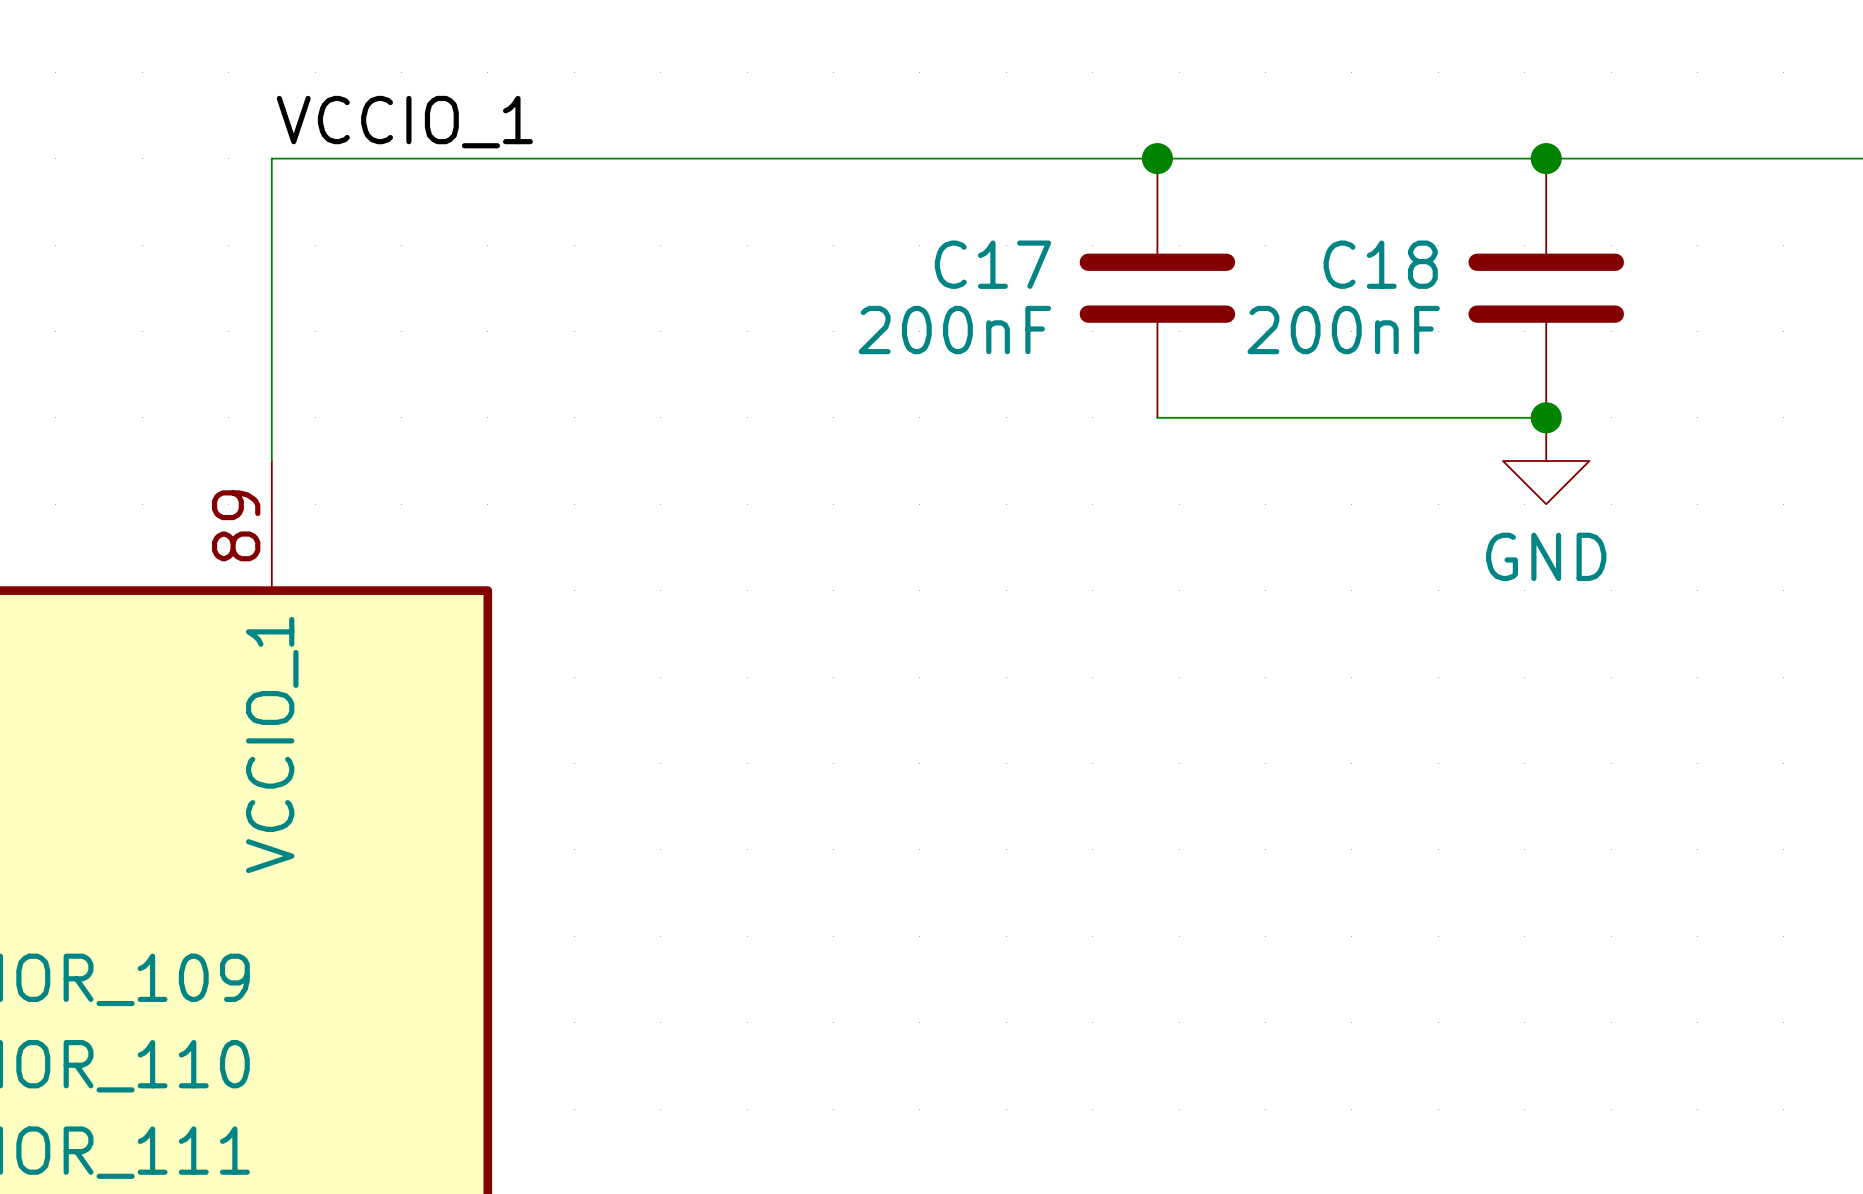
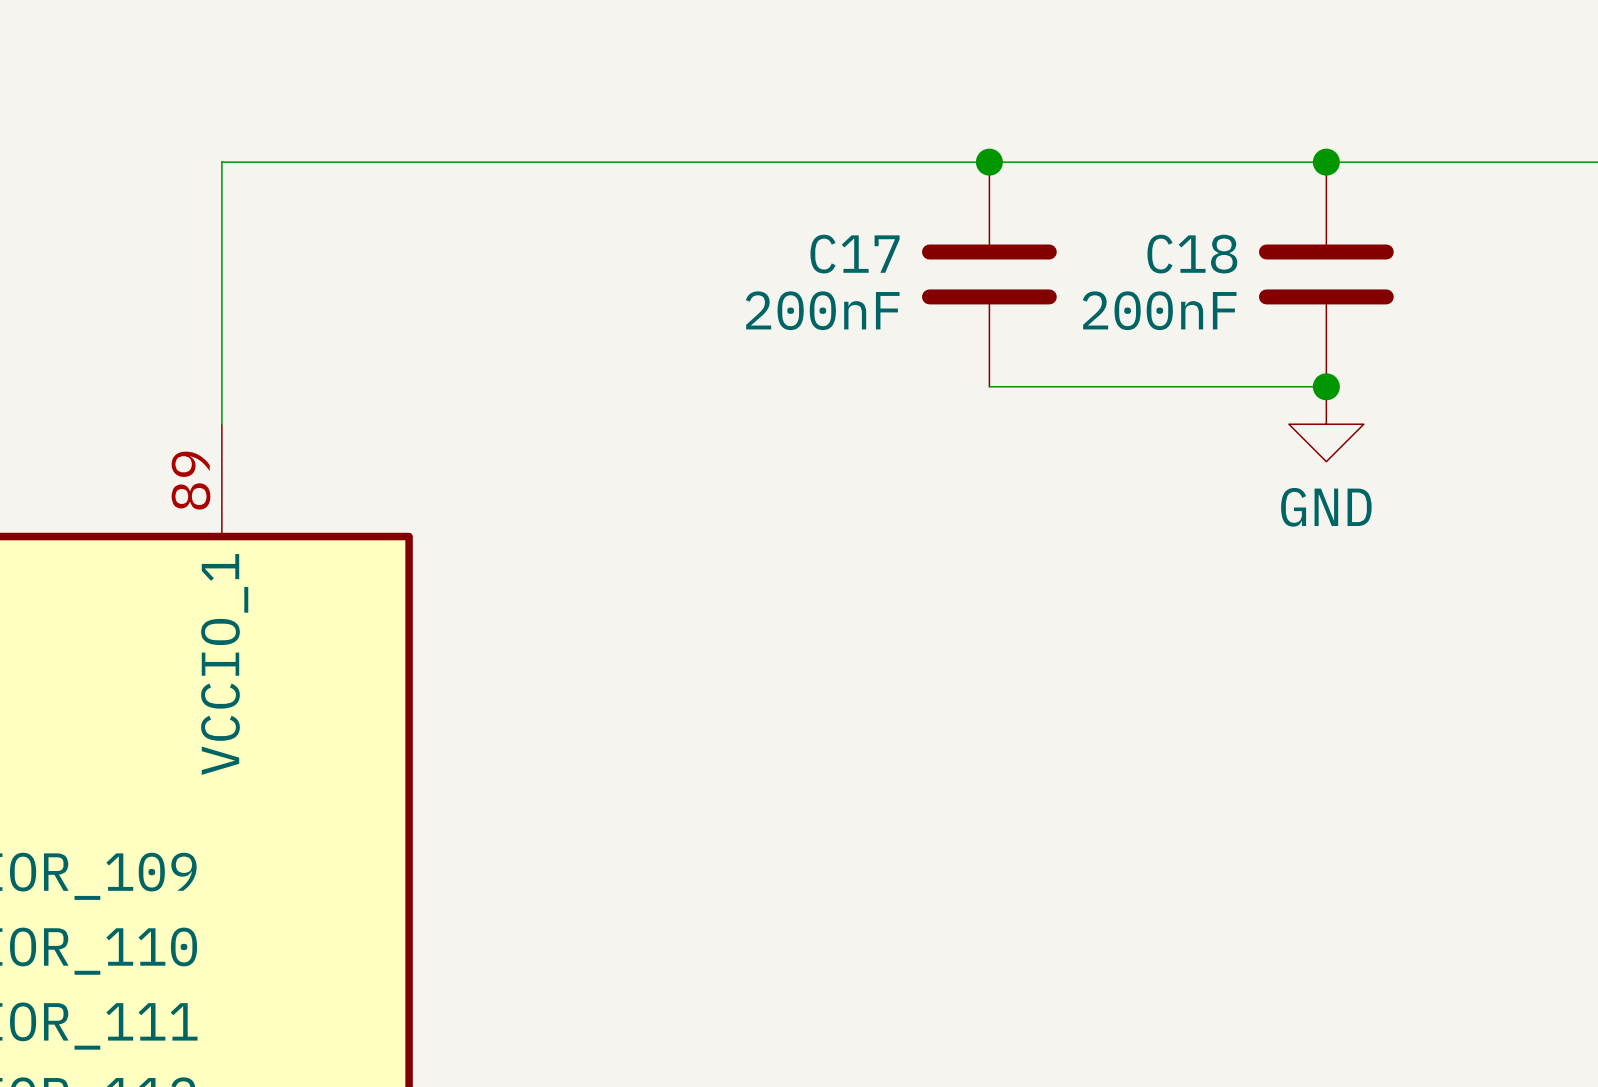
label: VCCIO_1 (404, 122) -> none

